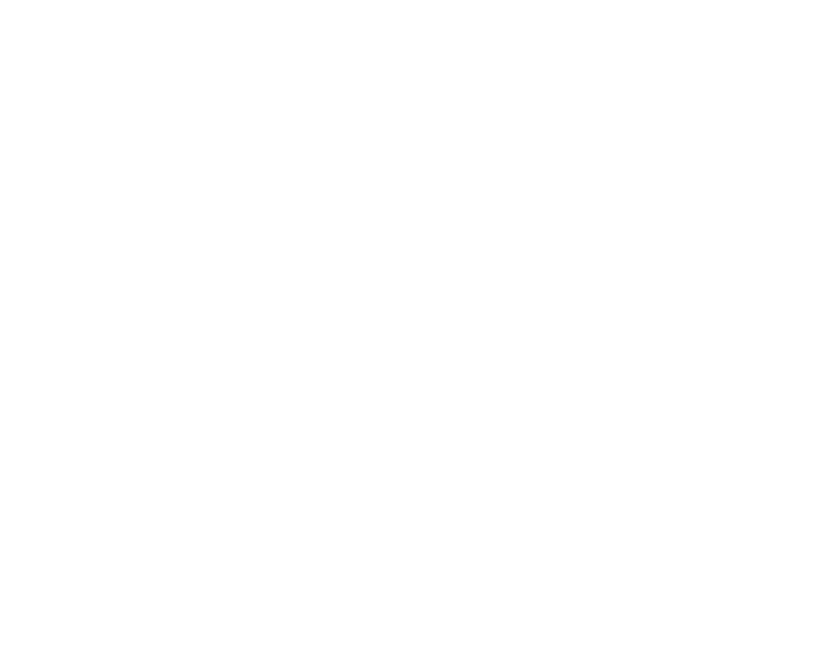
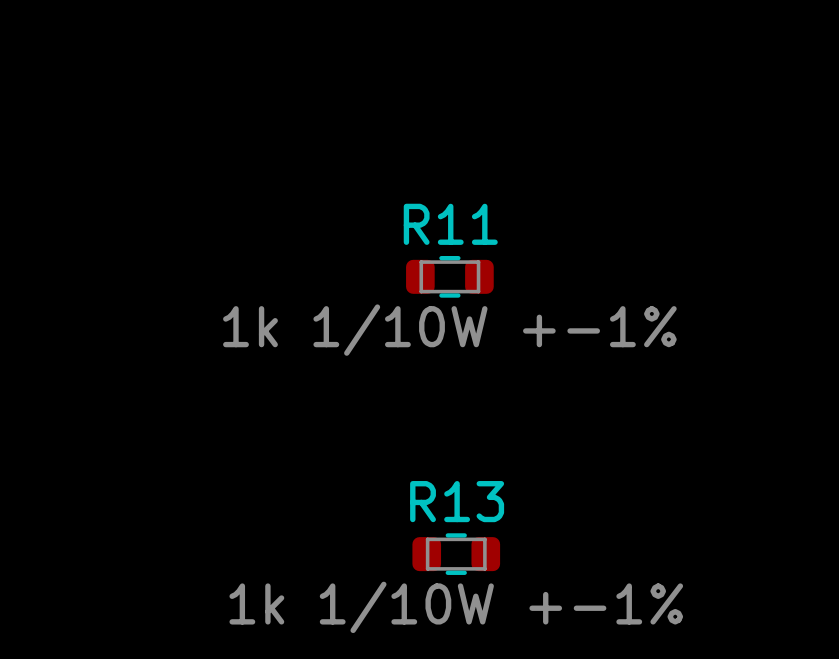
R11: none -> 1k 1/10W +-1% (449, 276)
R13: none -> 1k 1/10W +-1% (456, 554)

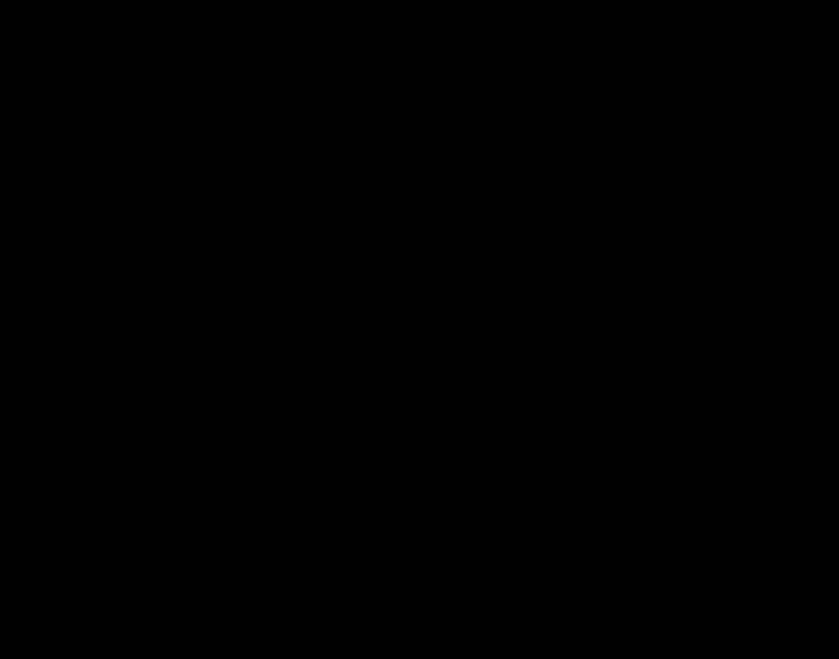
R11: 1k 1/10W +-1% (449, 276) -> none
R13: 1k 1/10W +-1% (456, 554) -> none

